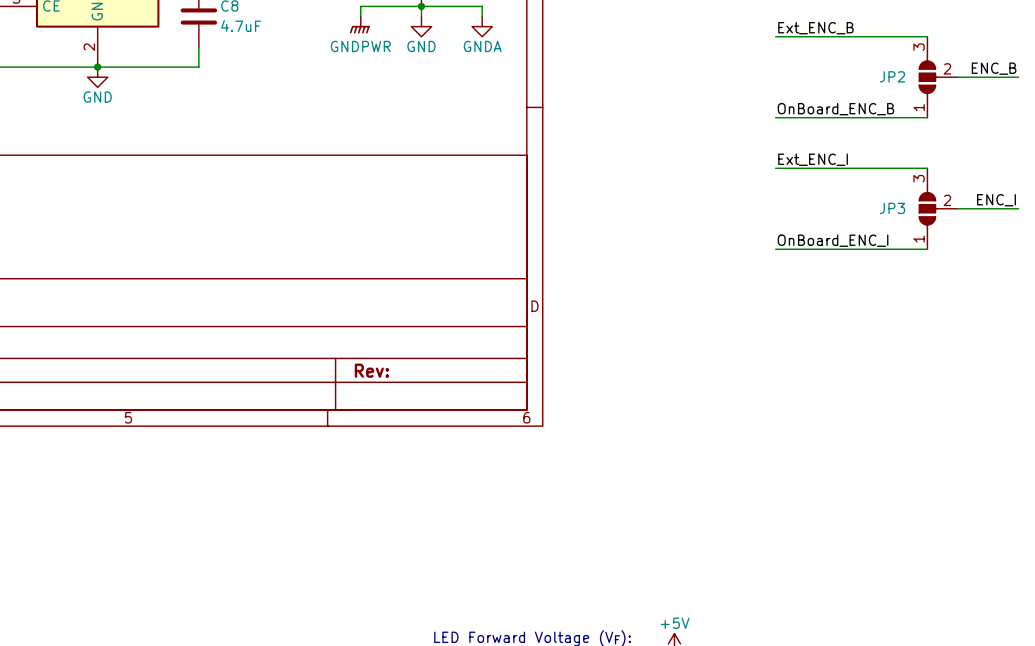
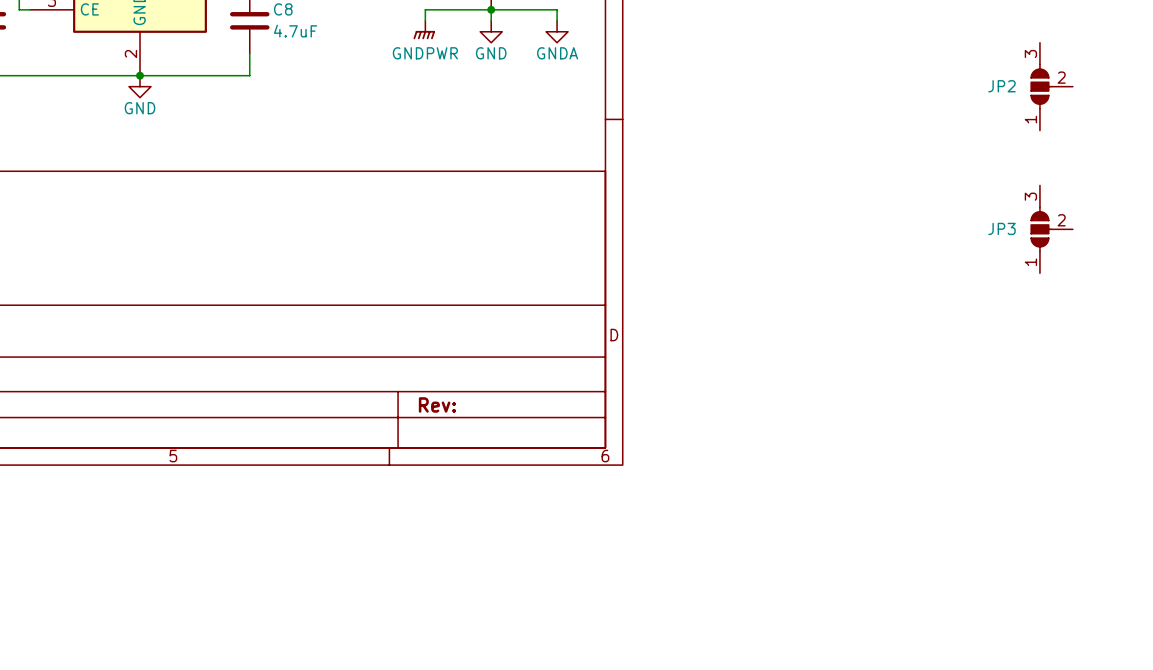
label: Ext_ENC_B (815, 28) -> none
wire: (775, 36) (927, 36) -> none
label: ENC_B (994, 68) -> none
wire: (957, 77) (1018, 77) -> none
label: OnBoard_ENC_B (835, 109) -> none
wire: (775, 117) (927, 117) -> none
label: Ext_ENC_I (813, 159) -> none
wire: (775, 168) (927, 168) -> none
label: ENC_I (996, 200) -> none
wire: (957, 208) (1018, 208) -> none
label: OnBoard_ENC_I (833, 240) -> none
wire: (775, 249) (927, 249) -> none

